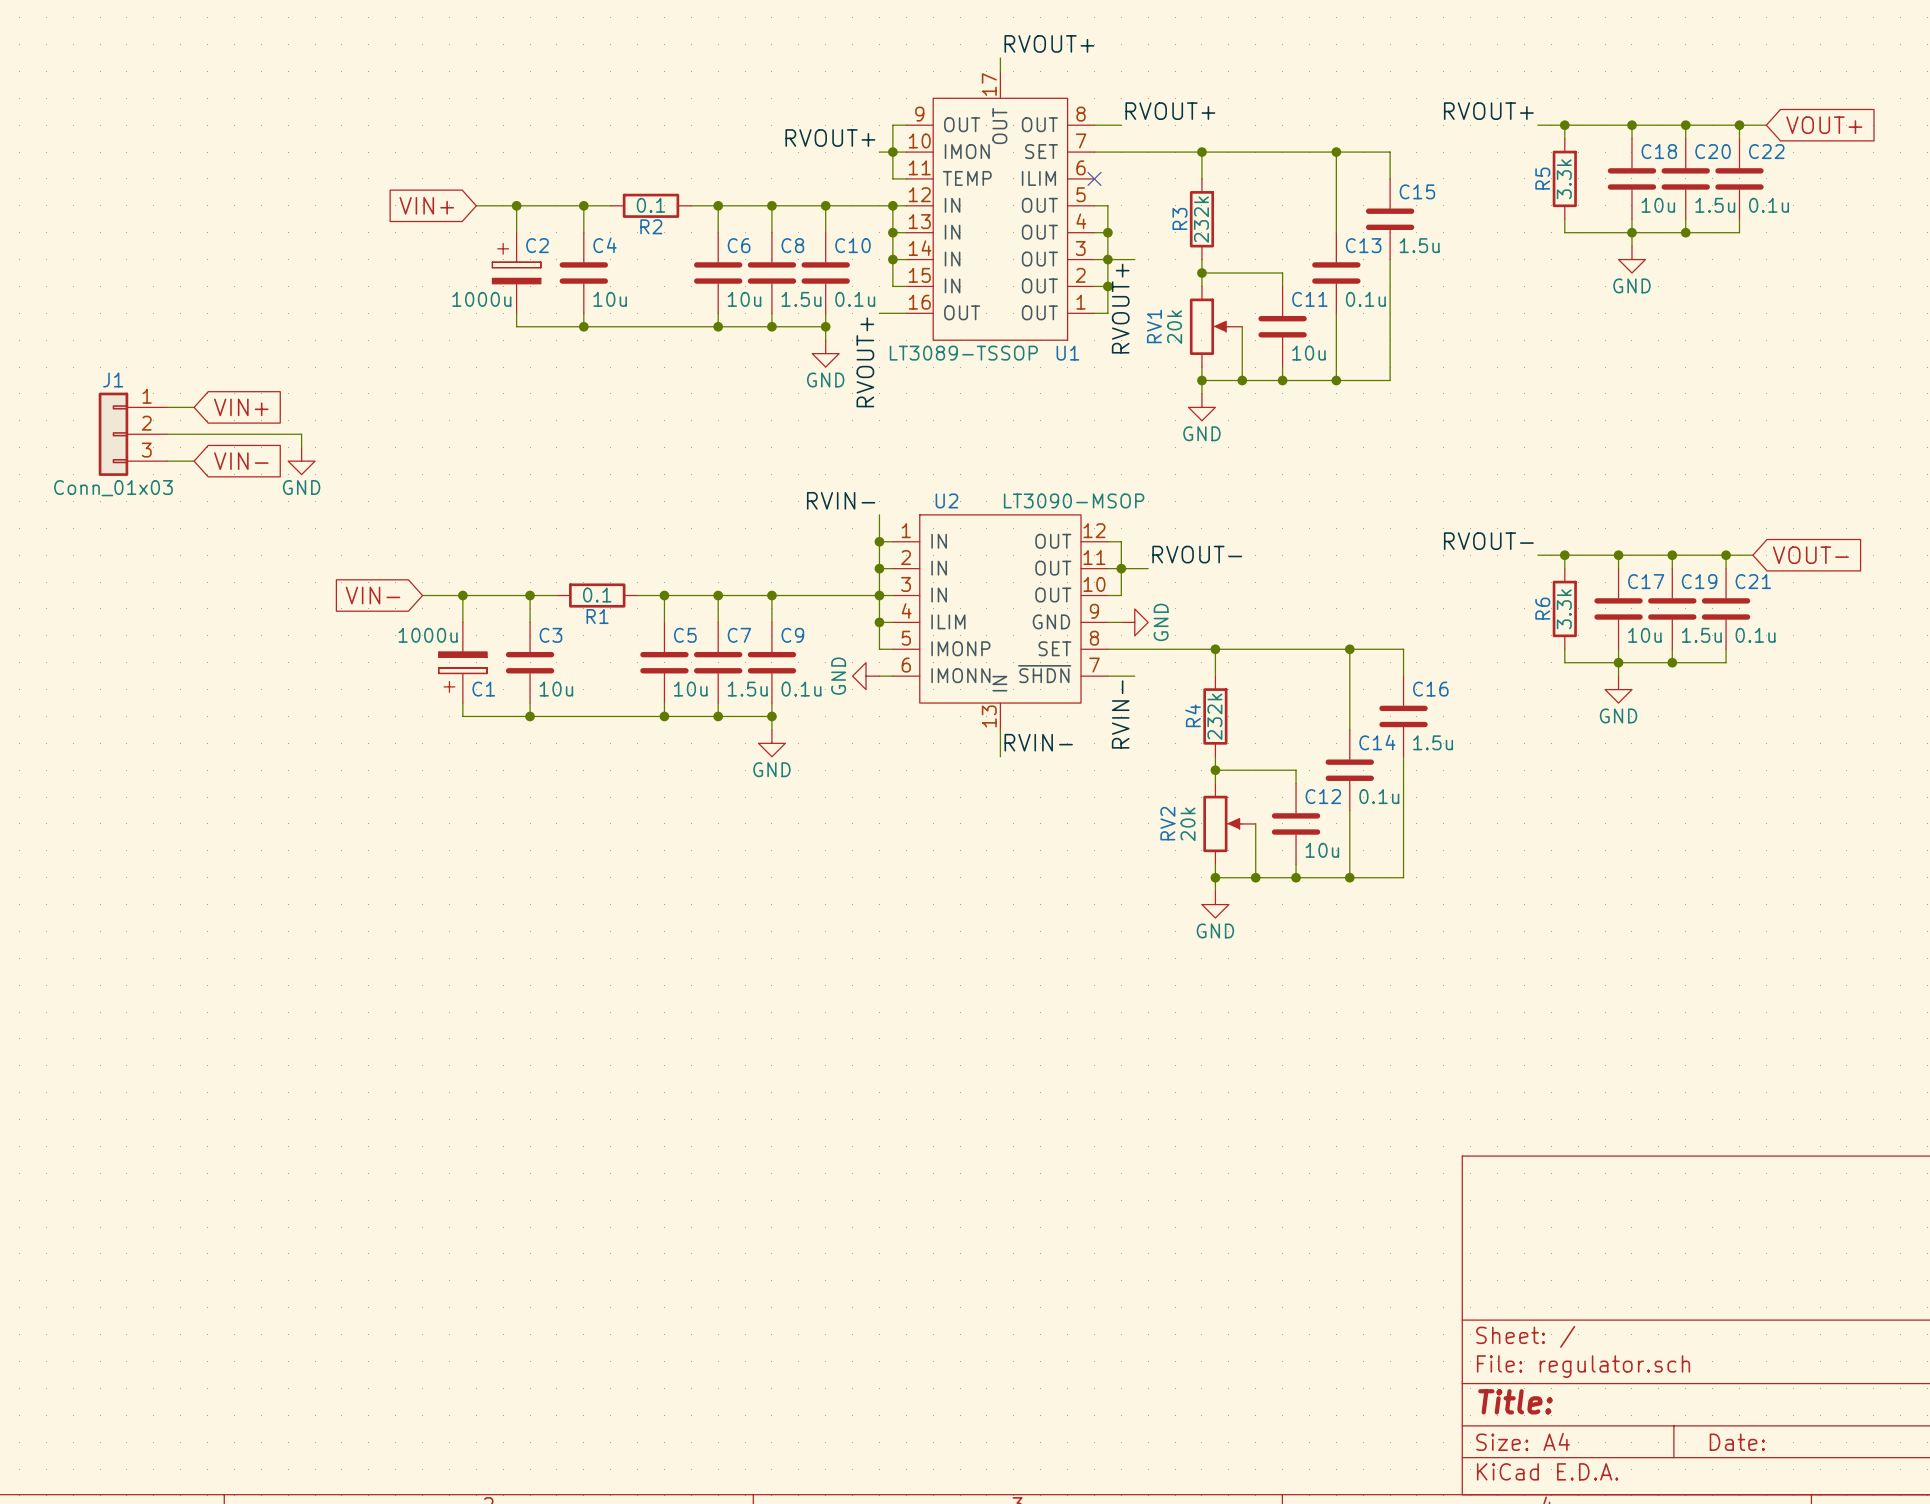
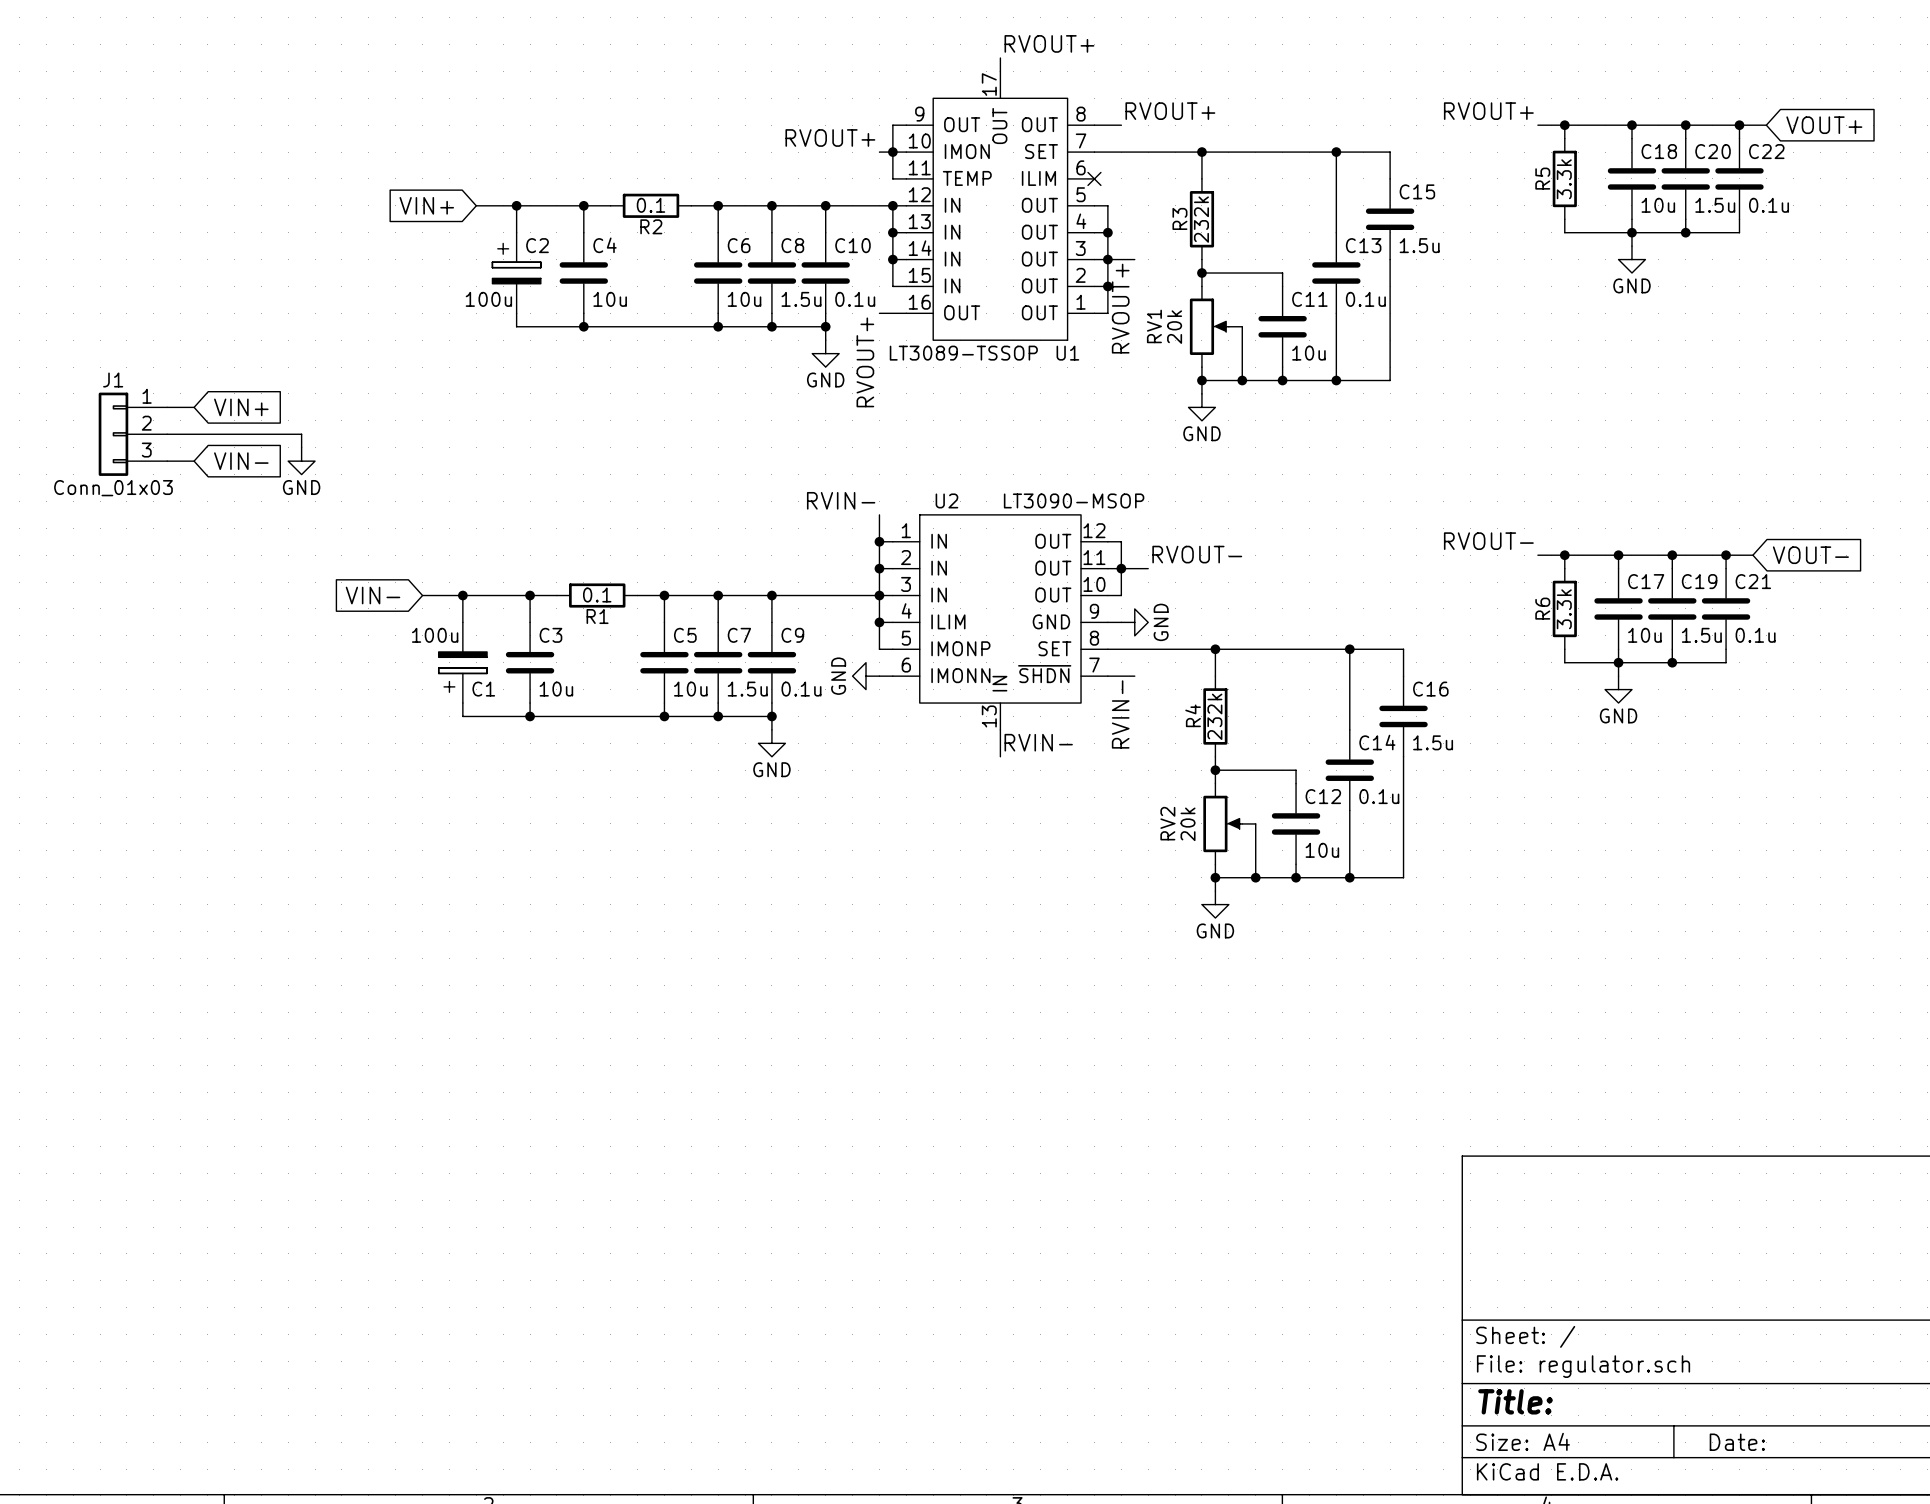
C2 value: 1000u (481, 299) -> 100u (488, 299)
C1 value: 1000u (428, 635) -> 100u (435, 635)

